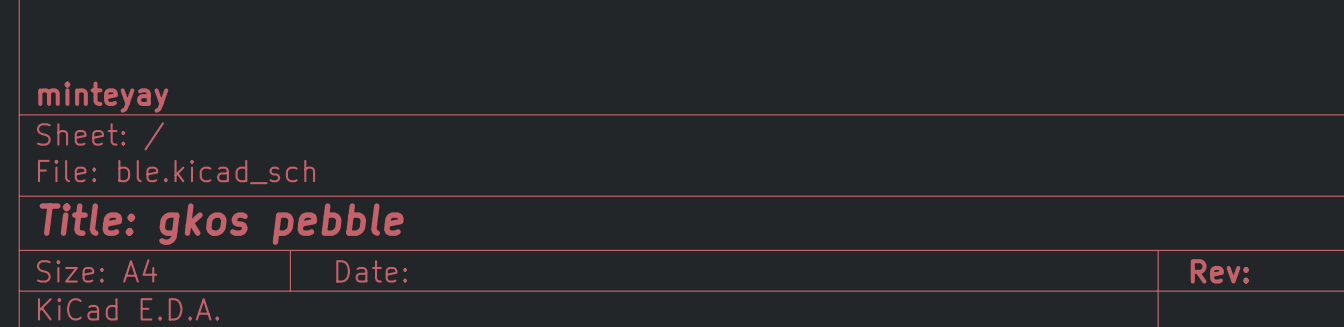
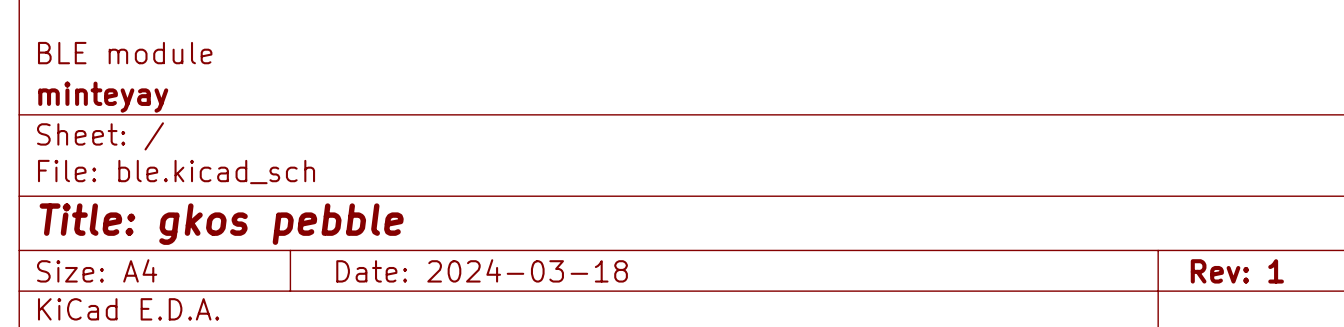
title block: none -> BLE module (125, 53)
title block: Date: (371, 271) -> Date: 2024-03-18 (482, 270)
title block: Rev: (1219, 271) -> Rev: 1 (1237, 271)

